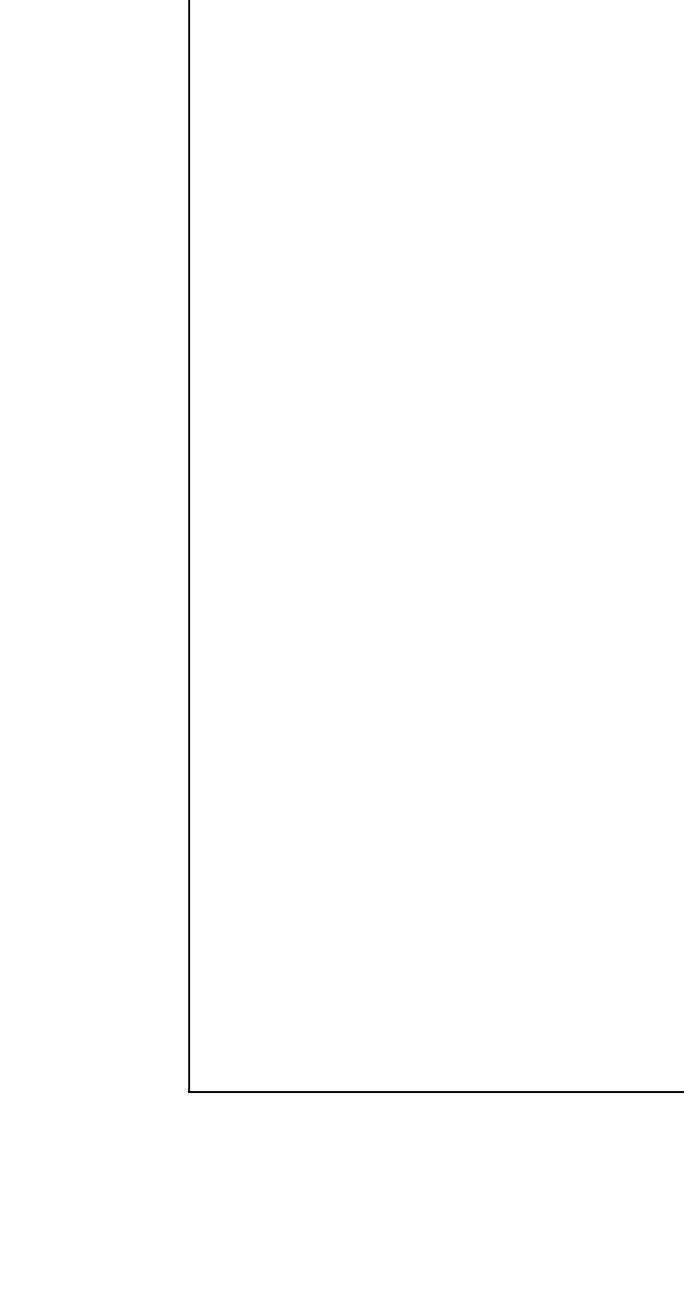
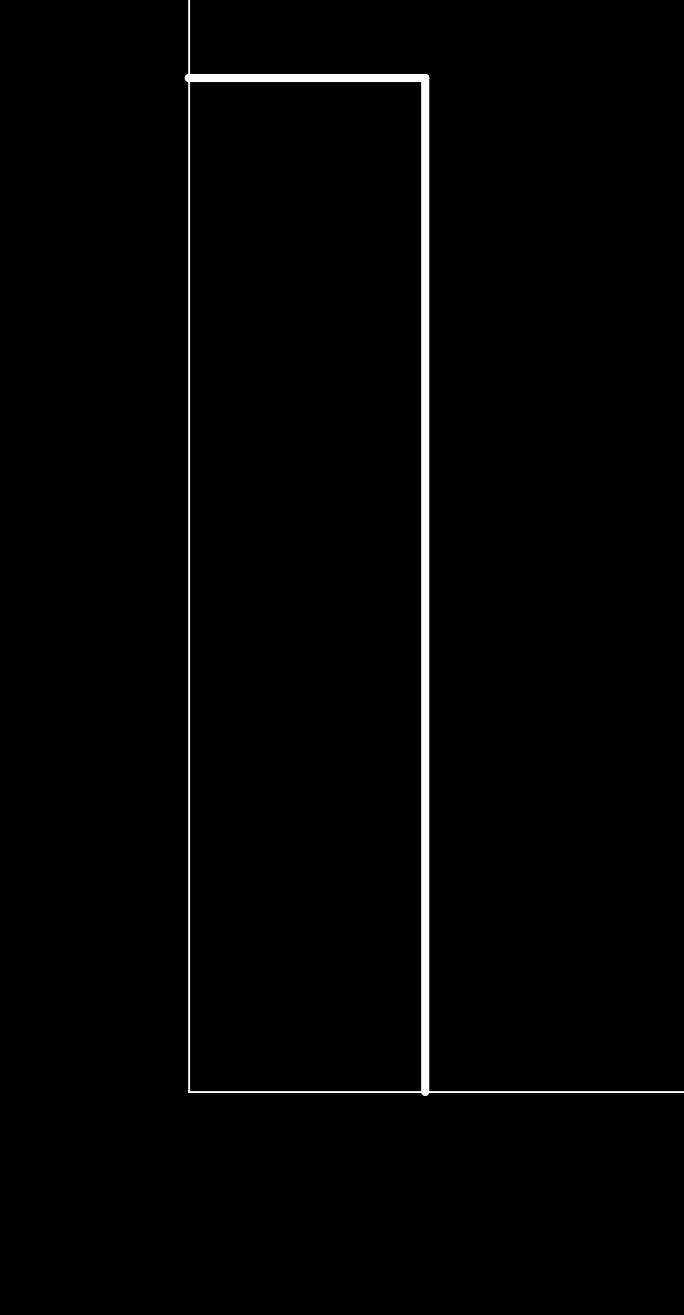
board edge: none -> (188, 78) (425, 78) (425, 1092)

